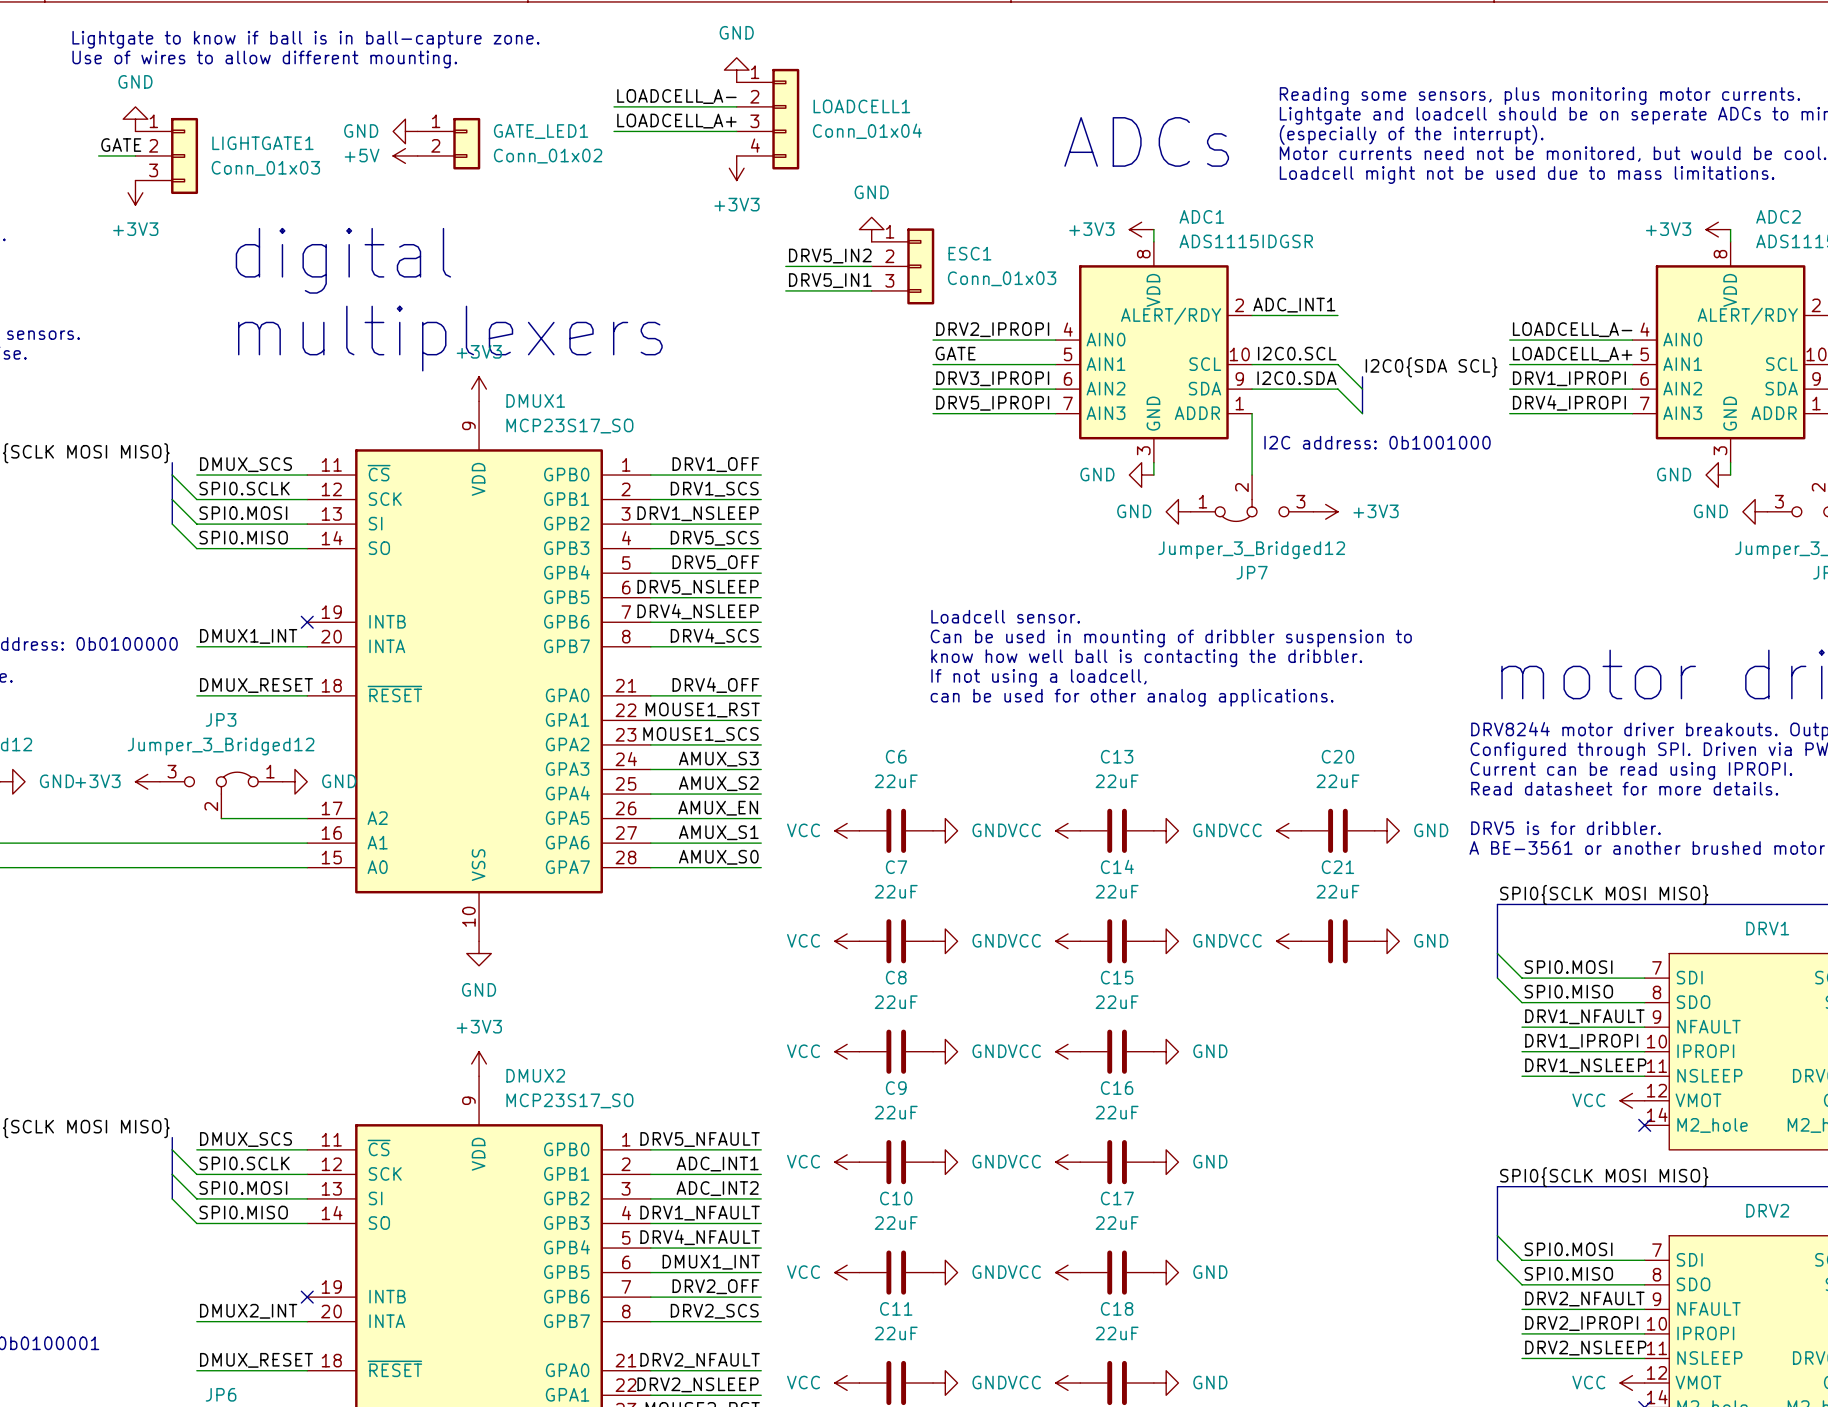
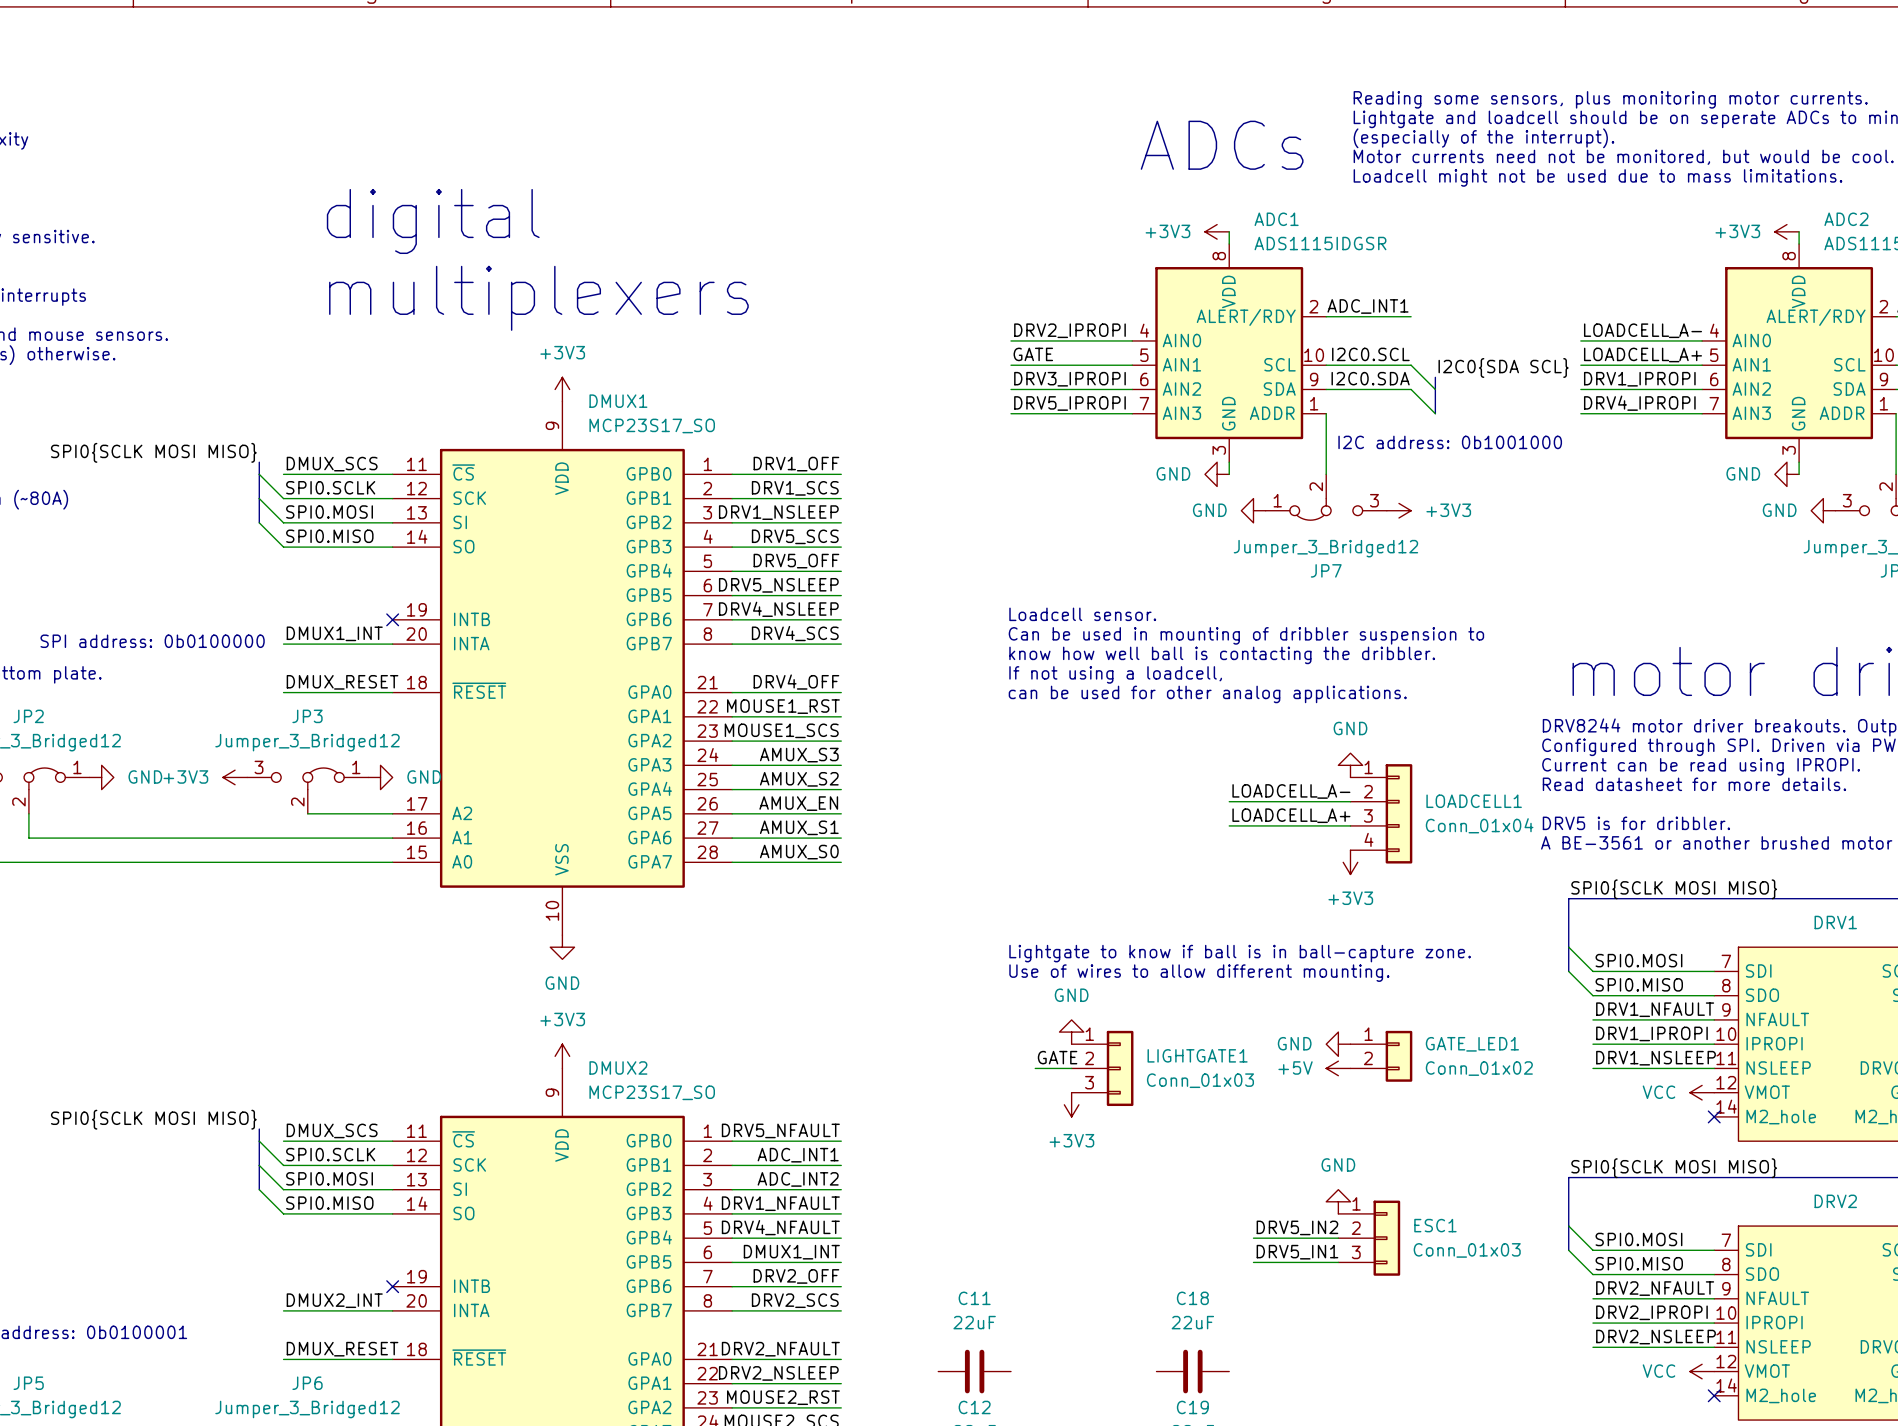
text: Lightgate to know if ball is in ball-capture zone. (305, 39) -> none
text: Use of wires to allow different mounting. (264, 59) -> none
power symbol: GND (736, 70) -> none
label: LOADCELL_A- (676, 96) -> none
wire: (614, 106) (736, 106) -> none
power symbol: GND (135, 119) -> none
LOADCELL1 position: (768, 119) -> (1381, 813)
label: LOADCELL_A+ (676, 121) -> none
power symbol: GND (405, 131) -> none
wire: (614, 131) (736, 131) -> none
GATE_LED1 position: (448, 143) -> (1381, 1056)
label: GATE (121, 145) -> none
wire: (98, 155) (135, 155) -> none
LIGHTGATE1 position: (166, 155) -> (1102, 1068)
power symbol: +5V (405, 155) -> none
power symbol: +3V3 (736, 168) -> none
power symbol: +3V3 (135, 192) -> none
power symbol: GND (871, 229) -> none
label: DRV5_IN2 (830, 256) -> none
text position: digital (343, 260) -> digital (433, 221)
wire: (785, 266) (871, 266) -> none
ESC1 position: (902, 266) -> (1369, 1238)
label: DRV5_IN1 (830, 280) -> none
wire: (785, 290) (871, 290) -> none
text position: multiplexers (450, 338) -> multiplexers (538, 298)
power symbol: none -> GND (1350, 765)
label: none -> LOADCELL_A- (1291, 791)
wire: none -> (1229, 801) (1350, 801)
label: none -> LOADCELL_A+ (1291, 815)
power symbol: VCC (847, 830) -> none
C6: 22uF (896, 830) -> none
power symbol: GND (945, 830) -> none
power symbol: VCC (1068, 830) -> none
C13: 22uF (1117, 830) -> none
wire: none -> (1229, 825) (1350, 825)
power symbol: GND (1166, 830) -> none
power symbol: VCC (1288, 830) -> none
C20: 22uF (1337, 830) -> none
power symbol: GND (1387, 830) -> none
power symbol: none -> +3V3 (1350, 862)
power symbol: VCC (847, 941) -> none
C7: 22uF (896, 941) -> none
power symbol: GND (945, 941) -> none
power symbol: VCC (1068, 941) -> none
C14: 22uF (1117, 941) -> none
power symbol: GND (1166, 941) -> none
power symbol: VCC (1288, 941) -> none
C21: 22uF (1337, 941) -> none
power symbol: GND (1387, 941) -> none
text: none -> Lightgate to know if ball is in ball-capture zone. (1240, 953)
text: none -> Use of wires to allow different mounting. (1199, 973)
power symbol: VCC (847, 1051) -> none
C8: 22uF (896, 1051) -> none
power symbol rotation: 0° (945, 1051) -> 90° counterclockwise (1071, 1032)
power symbol position: GND (945, 1051) -> GND (1071, 1032)
power symbol: VCC (1068, 1051) -> none
C15: 22uF (1117, 1051) -> none
power symbol: GND (1166, 1051) -> none
power symbol: none -> GND (1338, 1044)
label: none -> GATE (1057, 1057)
wire: none -> (1035, 1068) (1071, 1068)
power symbol: none -> +5V (1338, 1068)
power symbol: none -> +3V3 (1071, 1104)
power symbol: VCC (847, 1162) -> none
C9: 22uF (896, 1162) -> none
power symbol: GND (945, 1162) -> none
power symbol: VCC (1068, 1162) -> none
C16: 22uF (1117, 1162) -> none
power symbol: GND (1166, 1162) -> none
power symbol: none -> GND (1338, 1201)
label: none -> DRV5_IN2 (1297, 1227)
wire: none -> (1253, 1238) (1338, 1238)
label: none -> DRV5_IN1 (1297, 1252)
power symbol: VCC (847, 1272) -> none
C10: 22uF (896, 1272) -> none
power symbol: GND (945, 1272) -> none
power symbol: VCC (1068, 1272) -> none
C17: 22uF (1117, 1272) -> none
power symbol: GND (1166, 1272) -> none
wire: none -> (1253, 1262) (1338, 1262)
power symbol: VCC (847, 1383) -> none
power symbol: GND (945, 1383) -> none
power symbol: VCC (1068, 1383) -> none
power symbol: GND (1166, 1383) -> none

